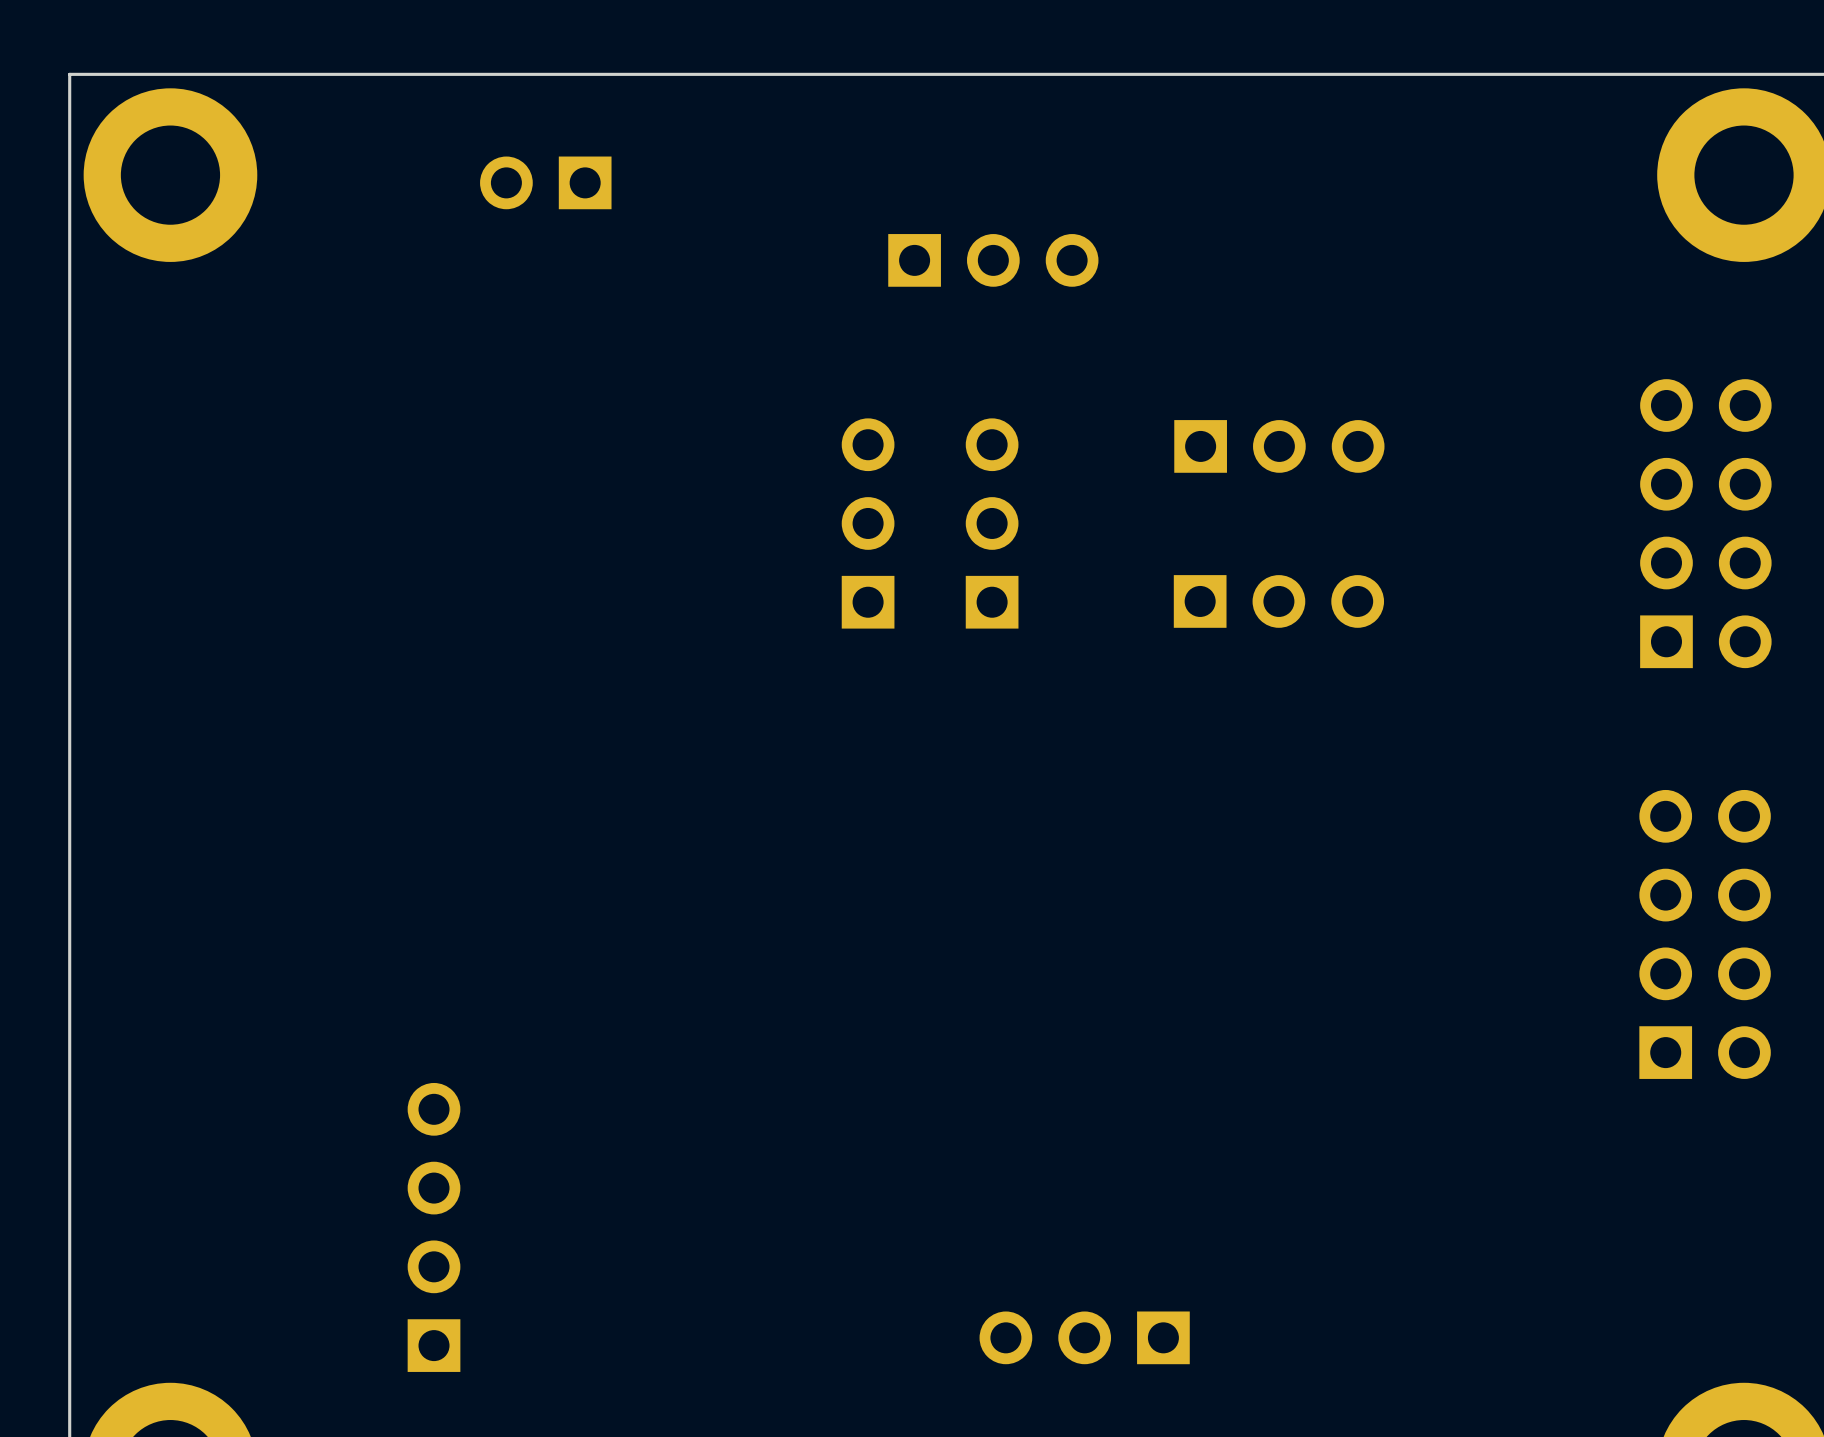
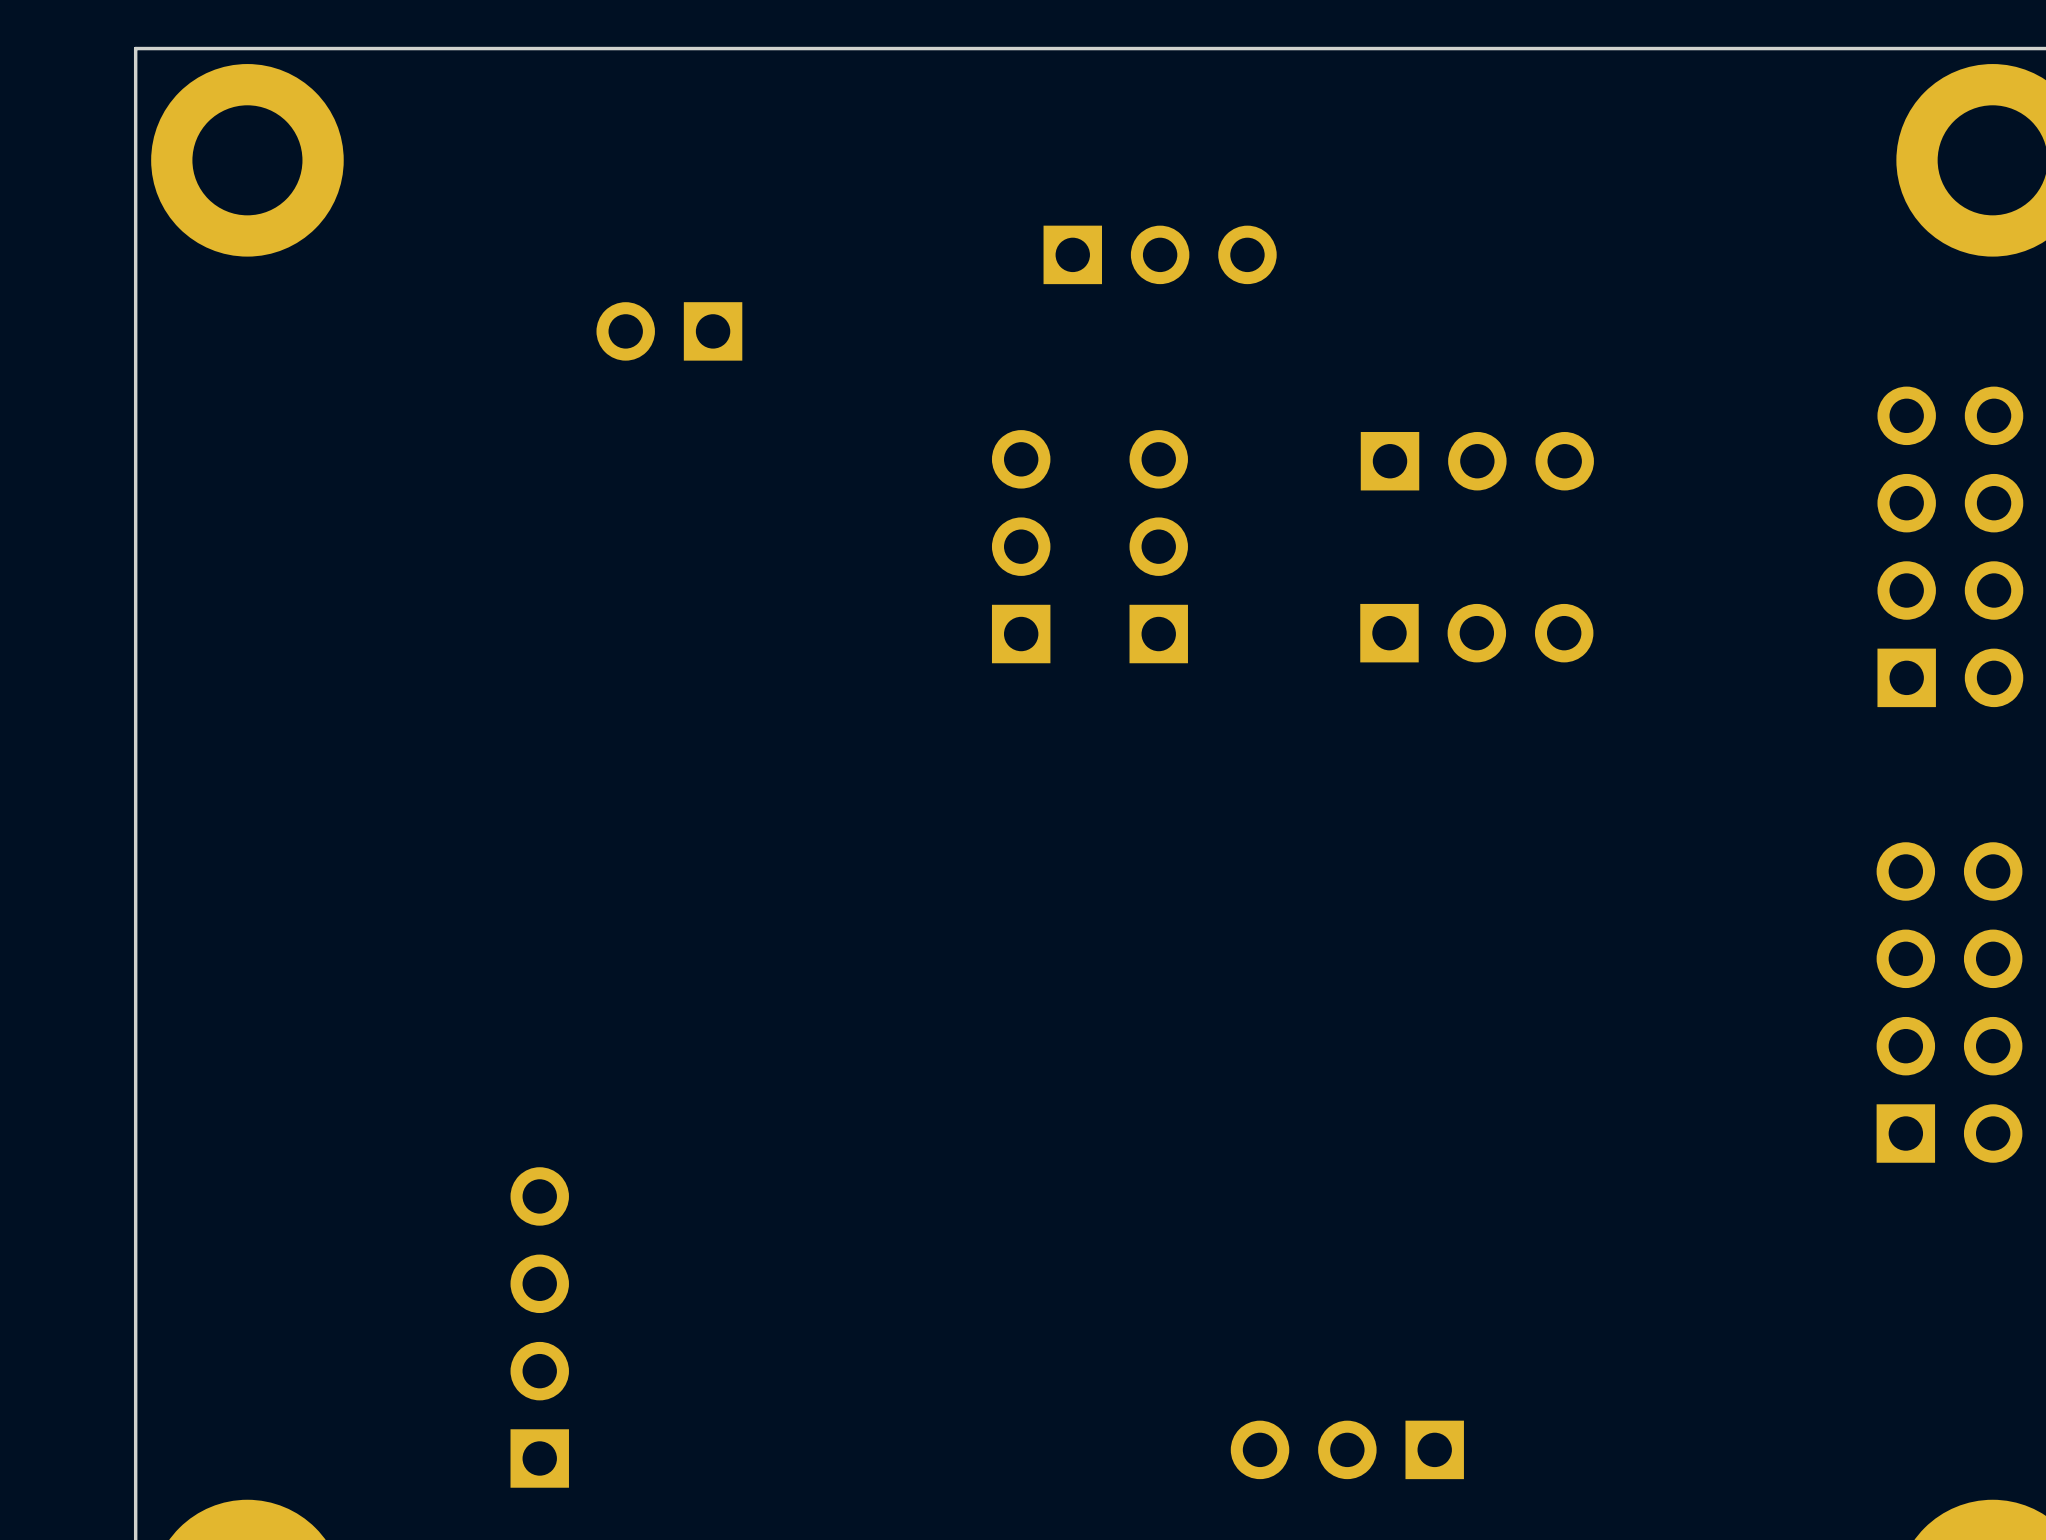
part position: (545, 182) -> (669, 331)
part position: (1084, 1337) -> (1347, 1449)

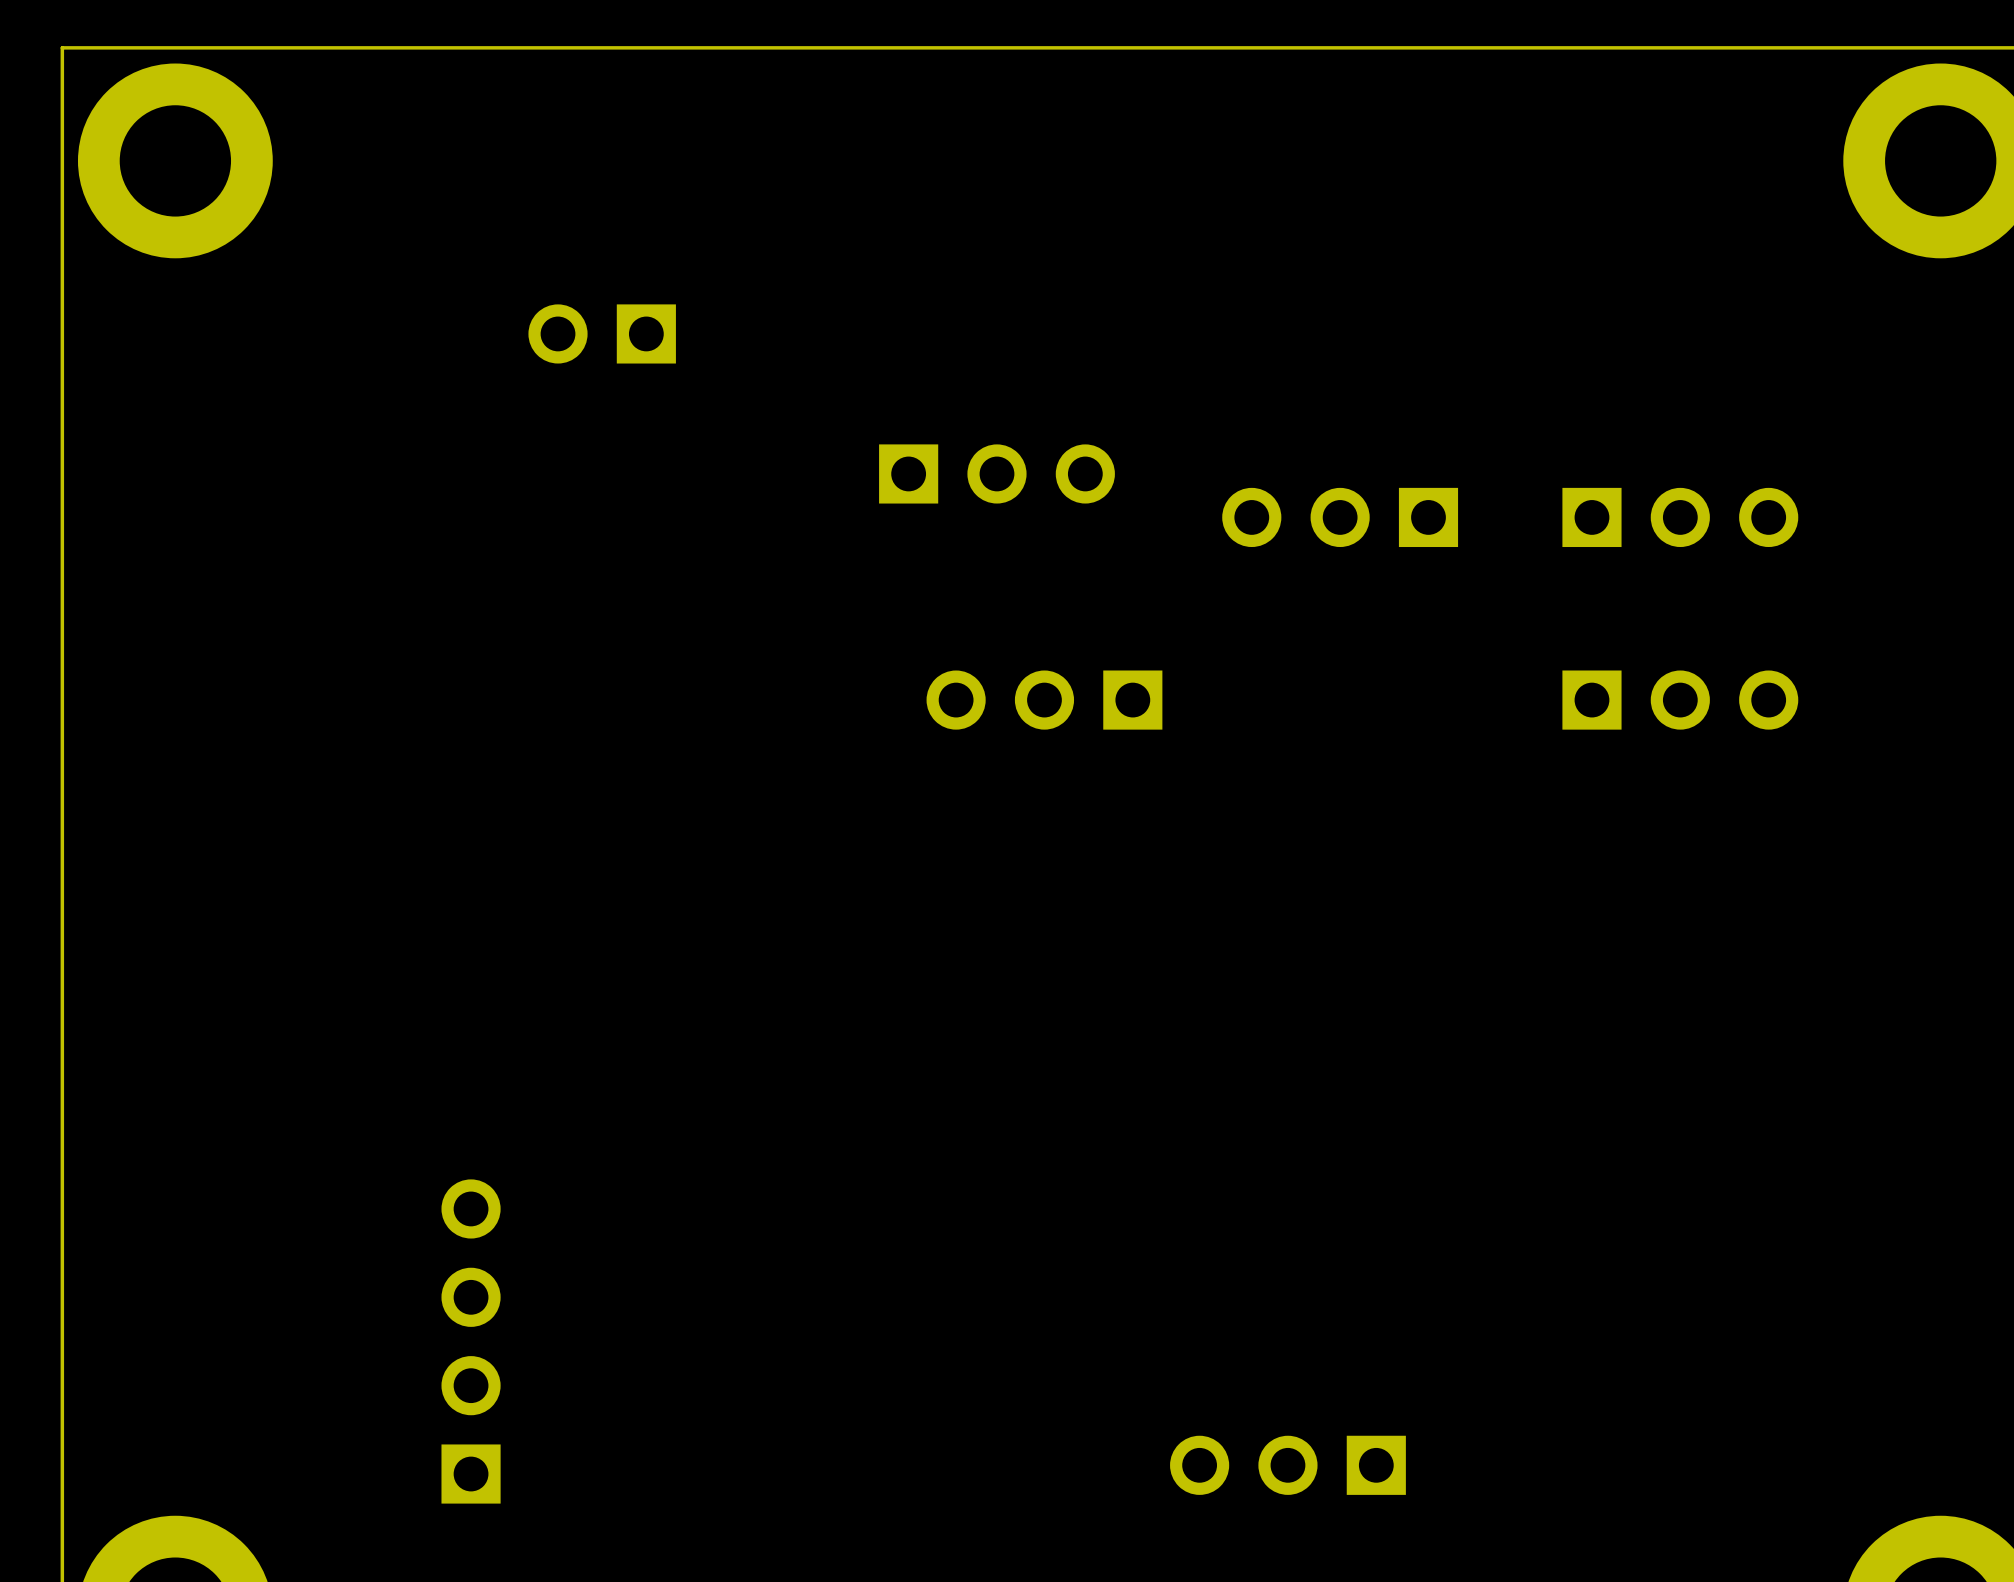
part: (1160, 254) -> none
part: (1477, 461) -> none
part: none -> (996, 473)
part: none -> (1340, 517)
part: none -> (1680, 517)
part: (1021, 546) -> none
part: (1158, 546) -> none
part: (1950, 546) -> none
part: (1476, 633) -> none
part: none -> (1044, 700)
part: none -> (1680, 700)
part: (1949, 1002) -> none

